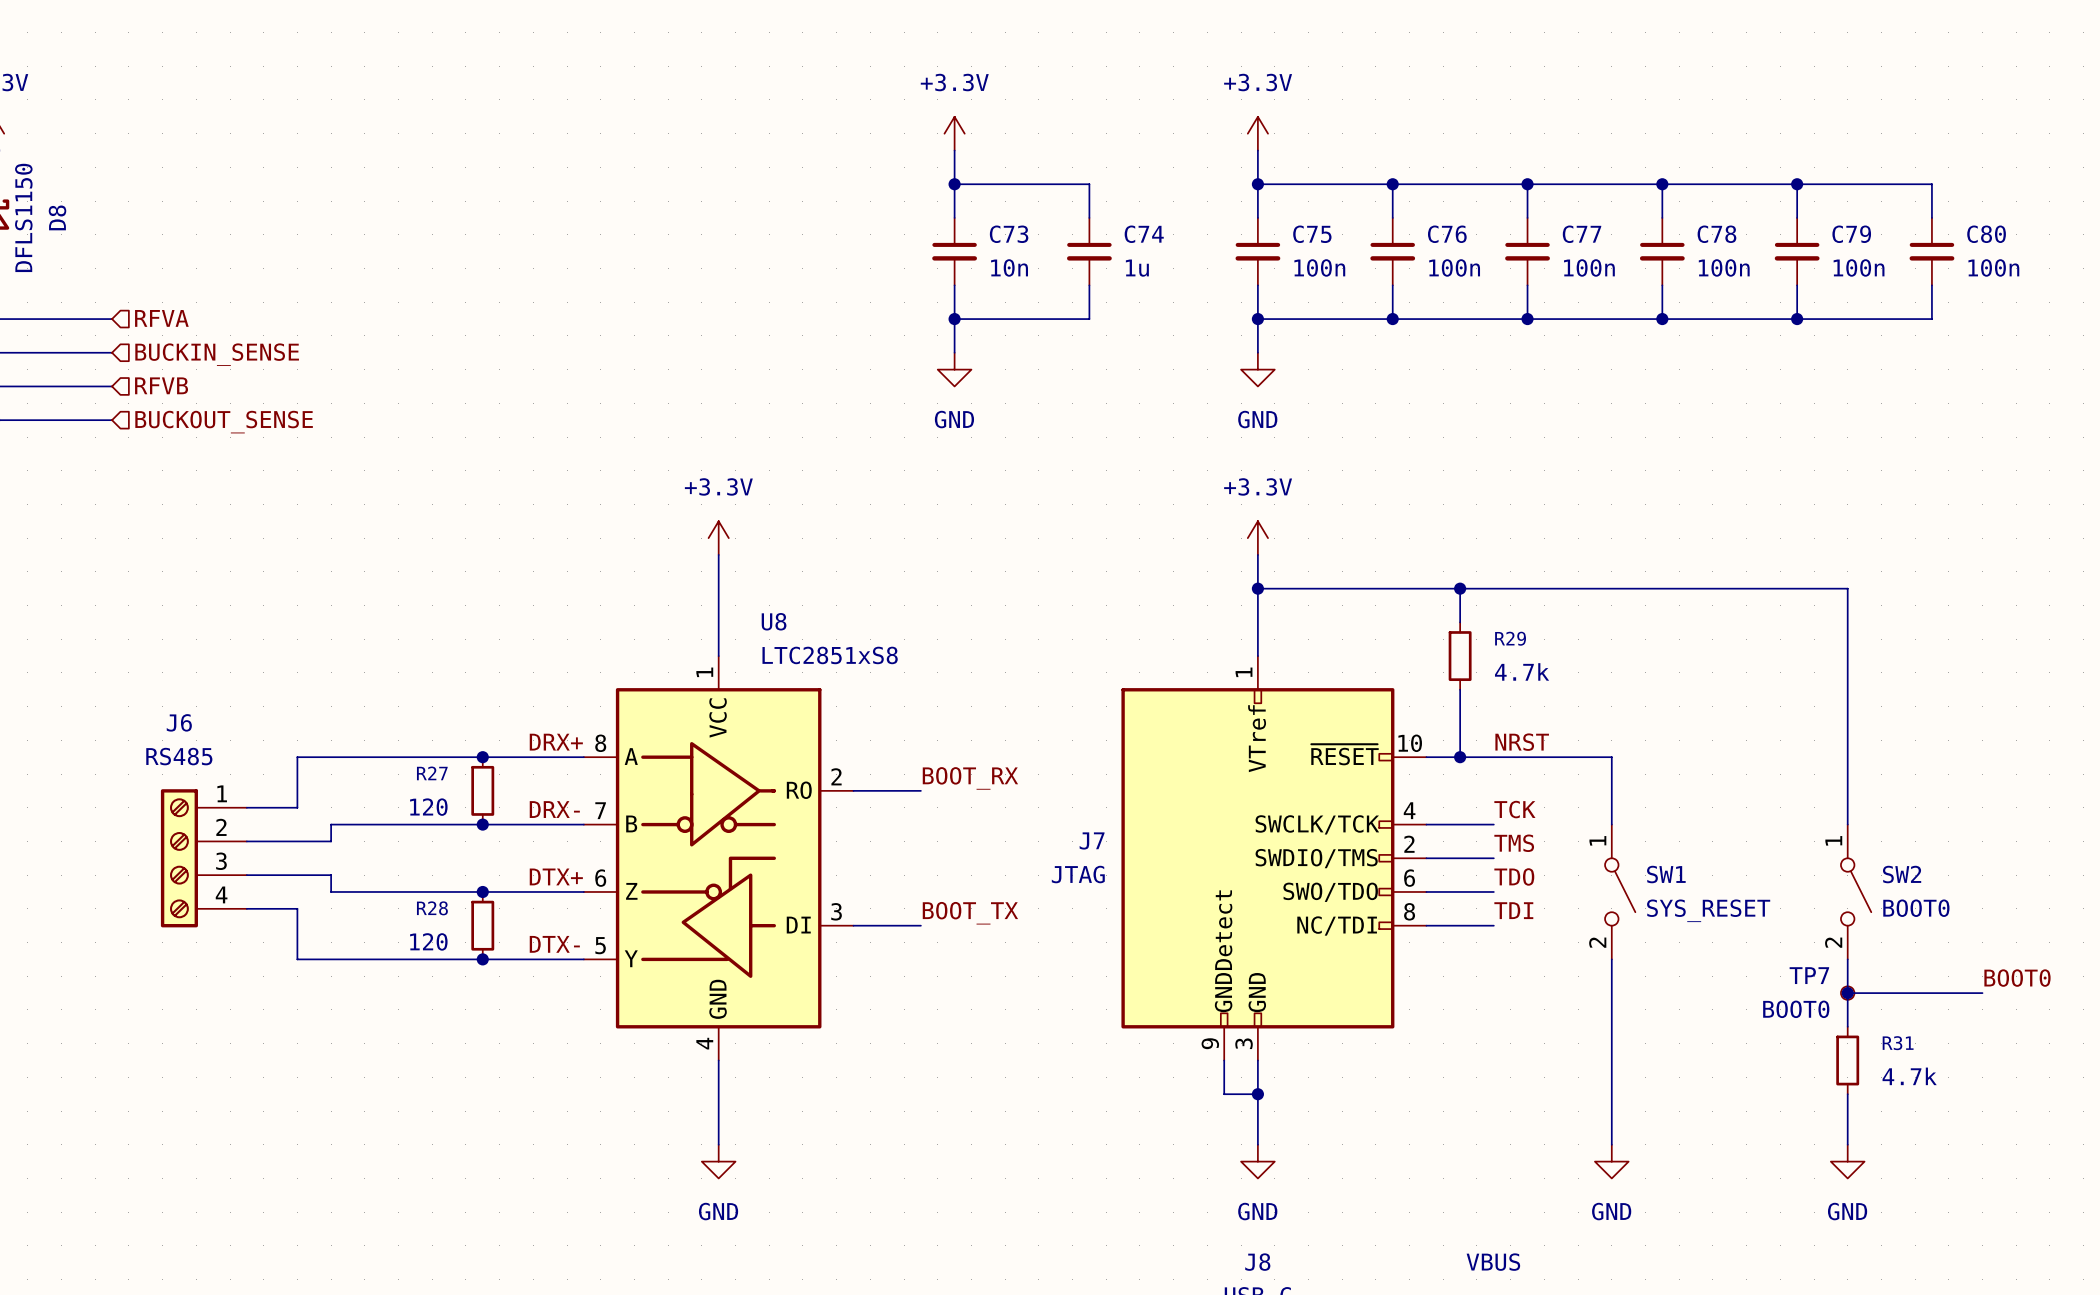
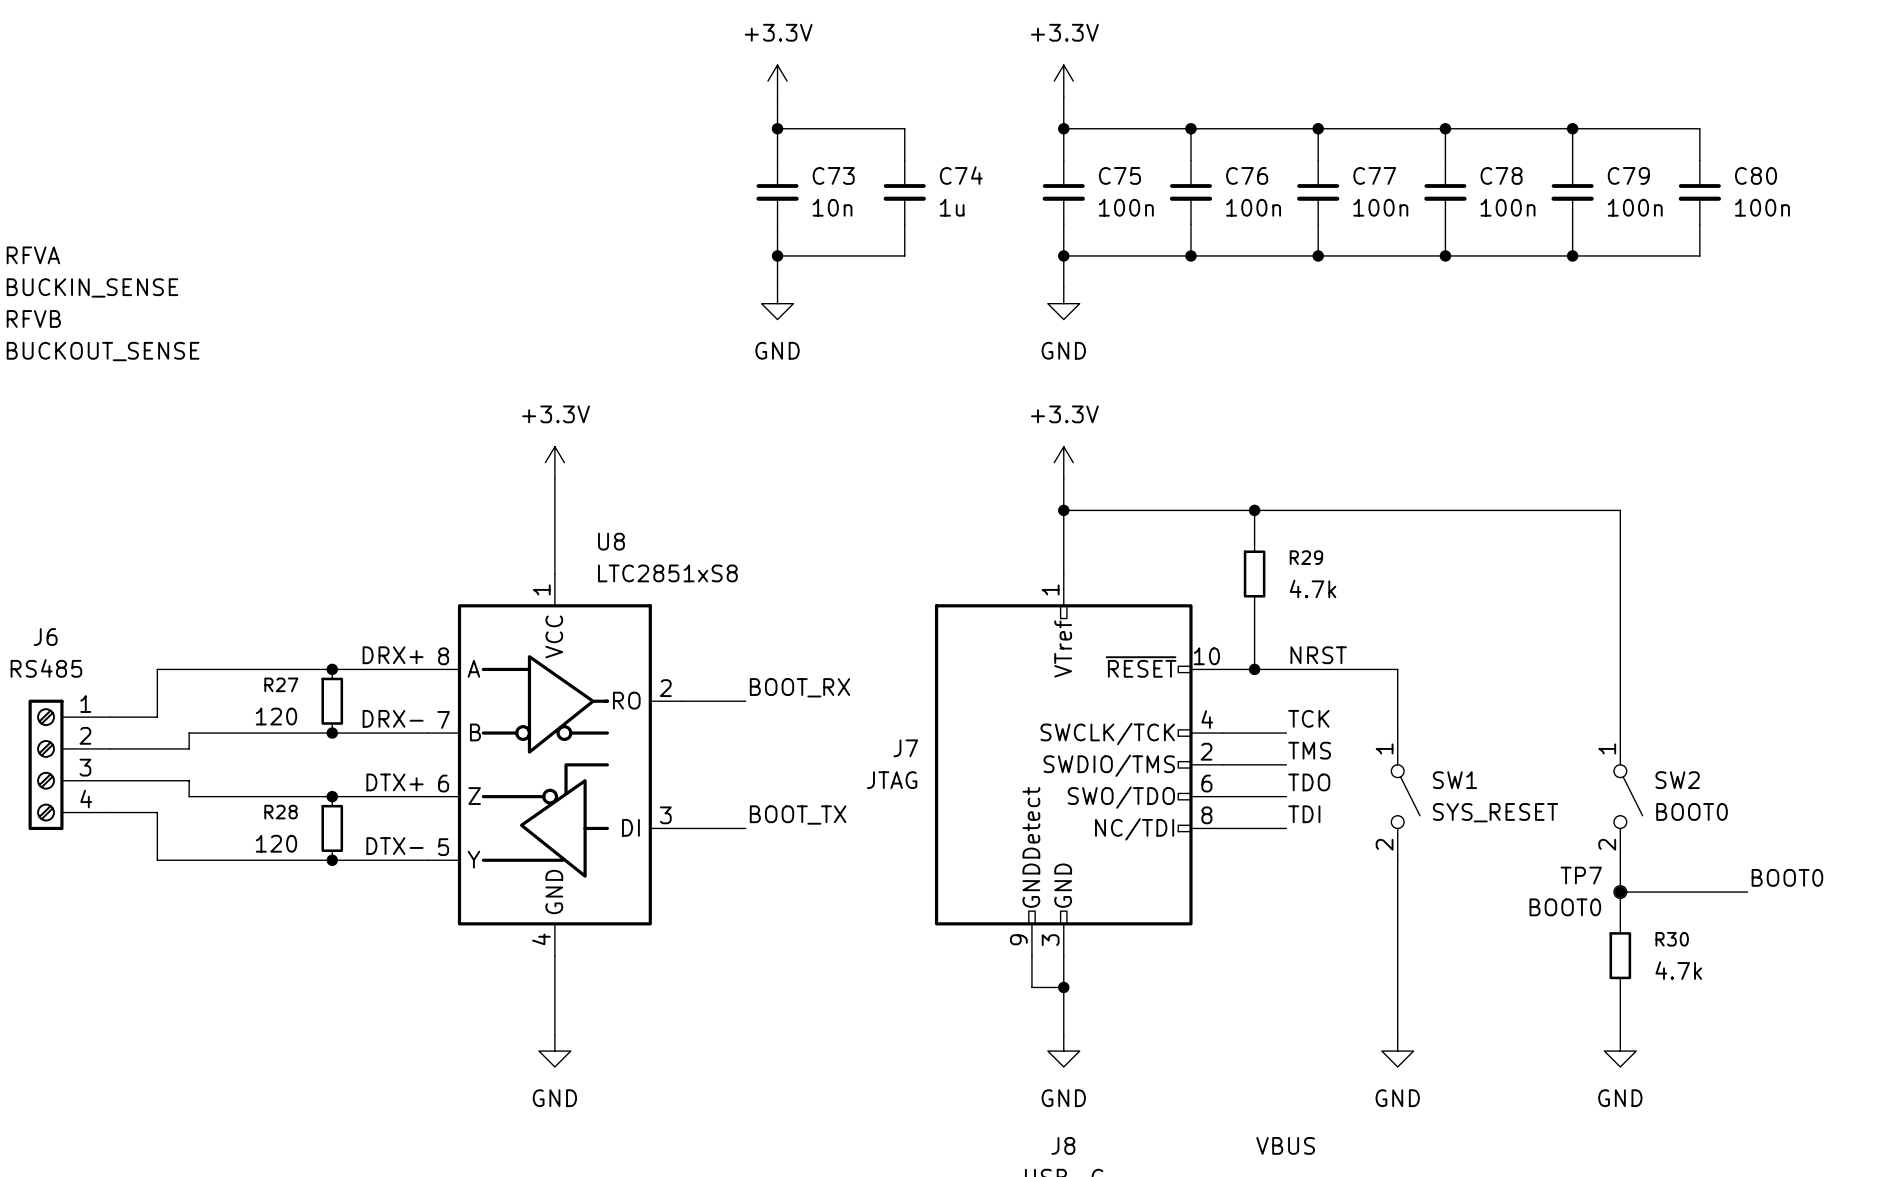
R31 name: R31 (1898, 1043) -> R30 (1672, 939)

